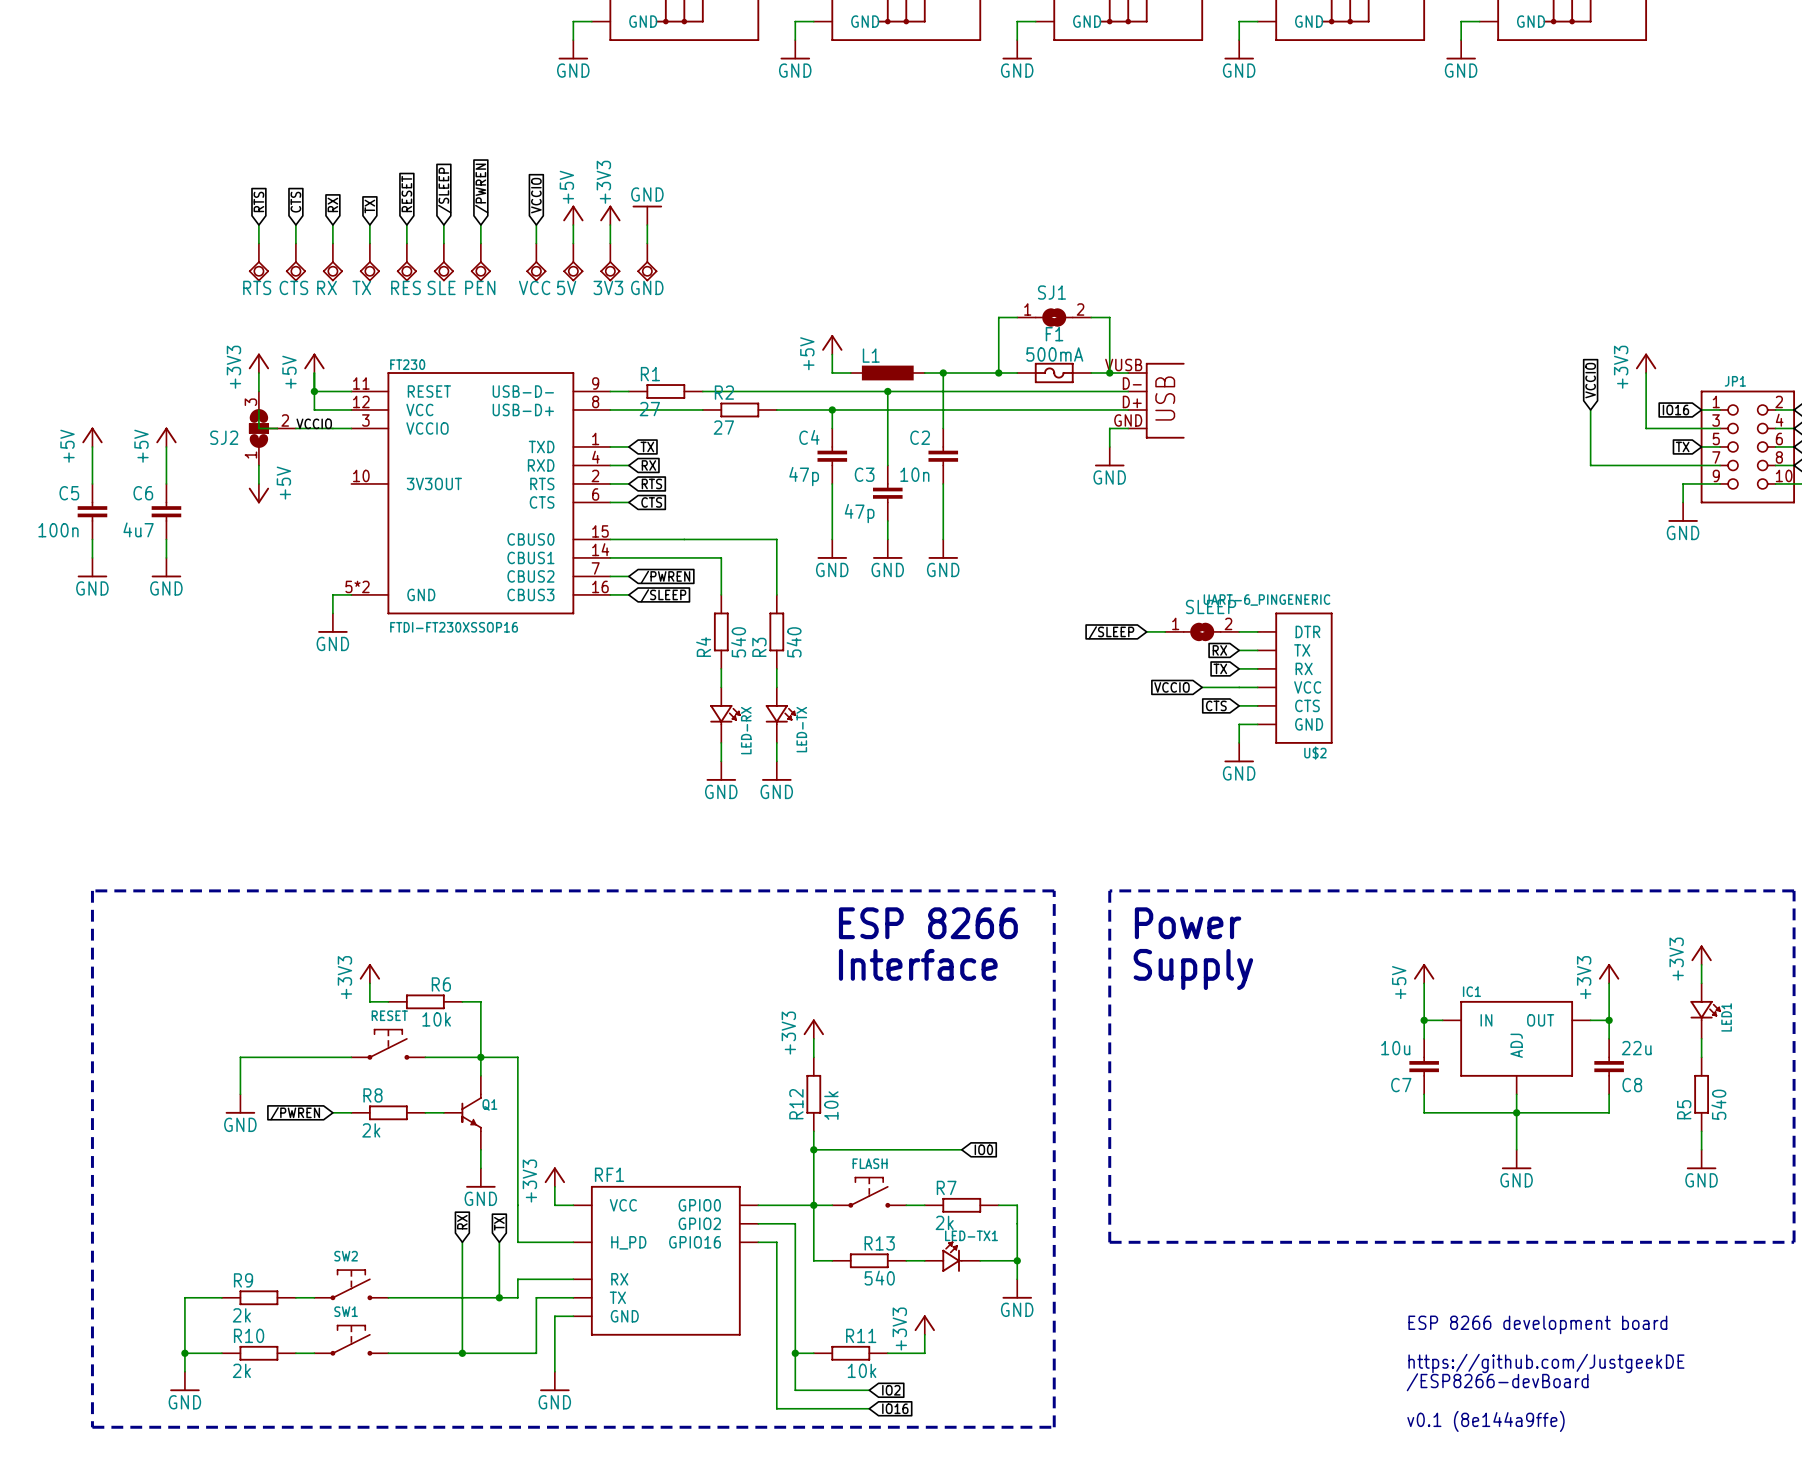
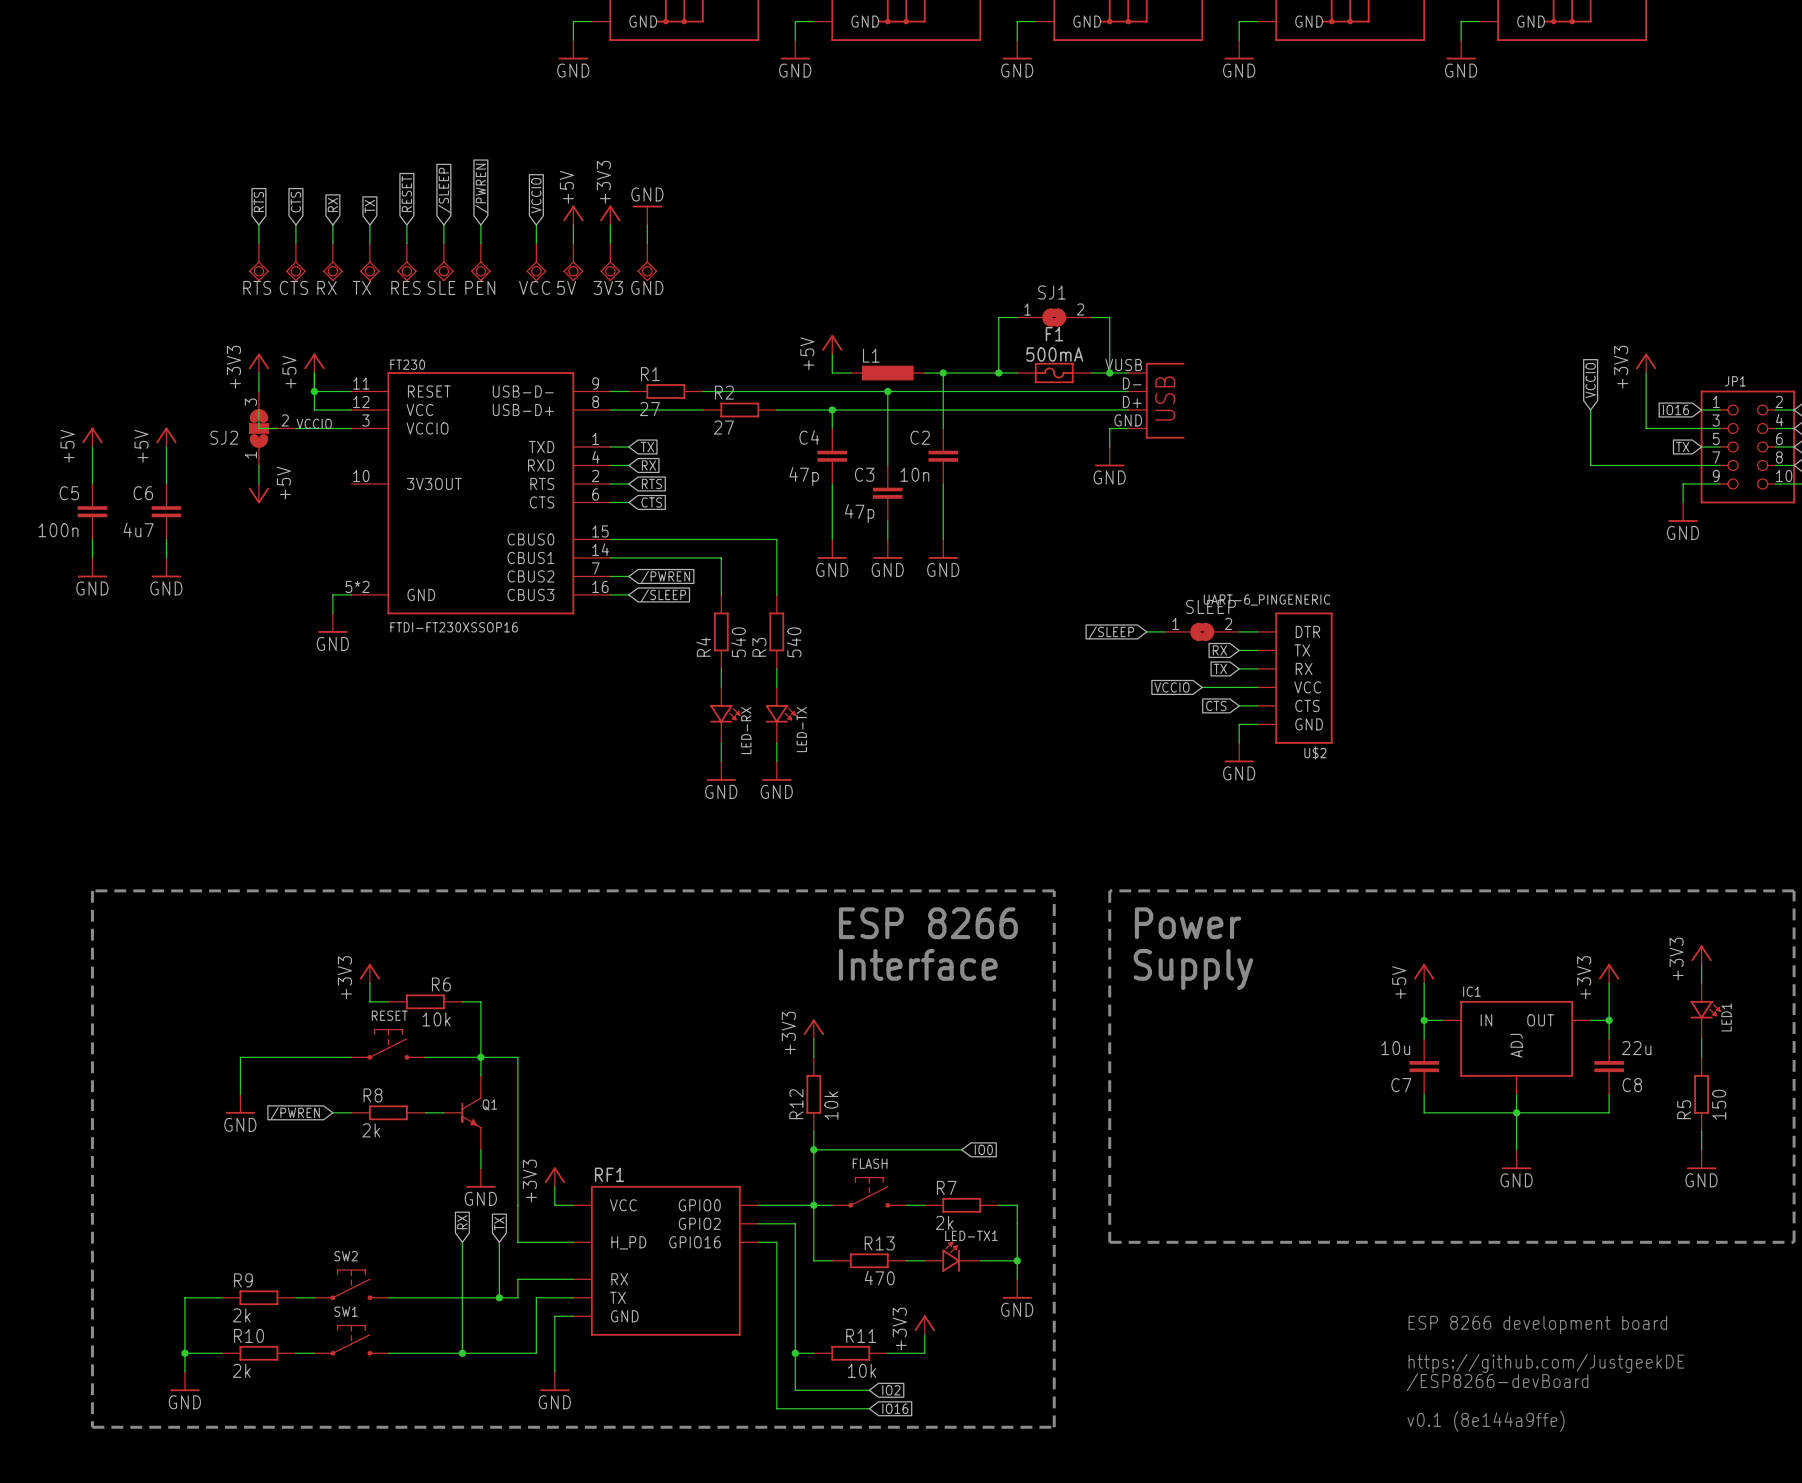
R5 value: 540 (1718, 1104) -> 150 (1719, 1104)
R13 value: 540 (879, 1278) -> 470 (879, 1278)

